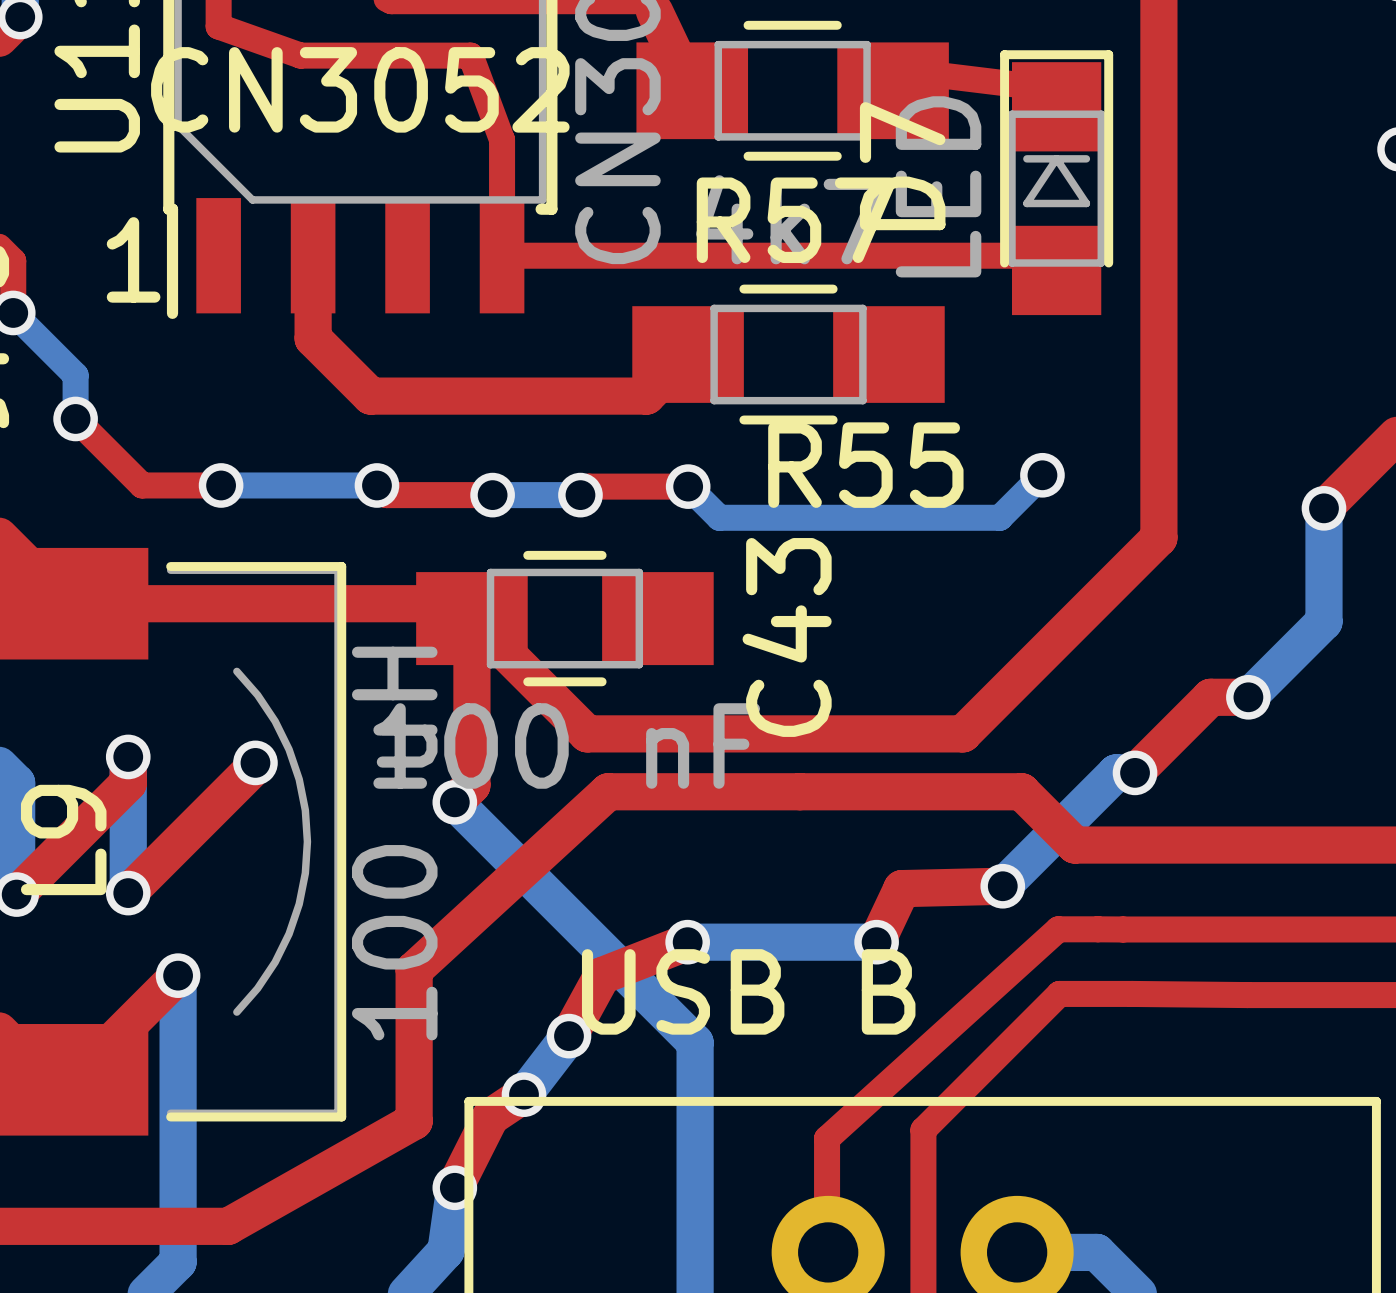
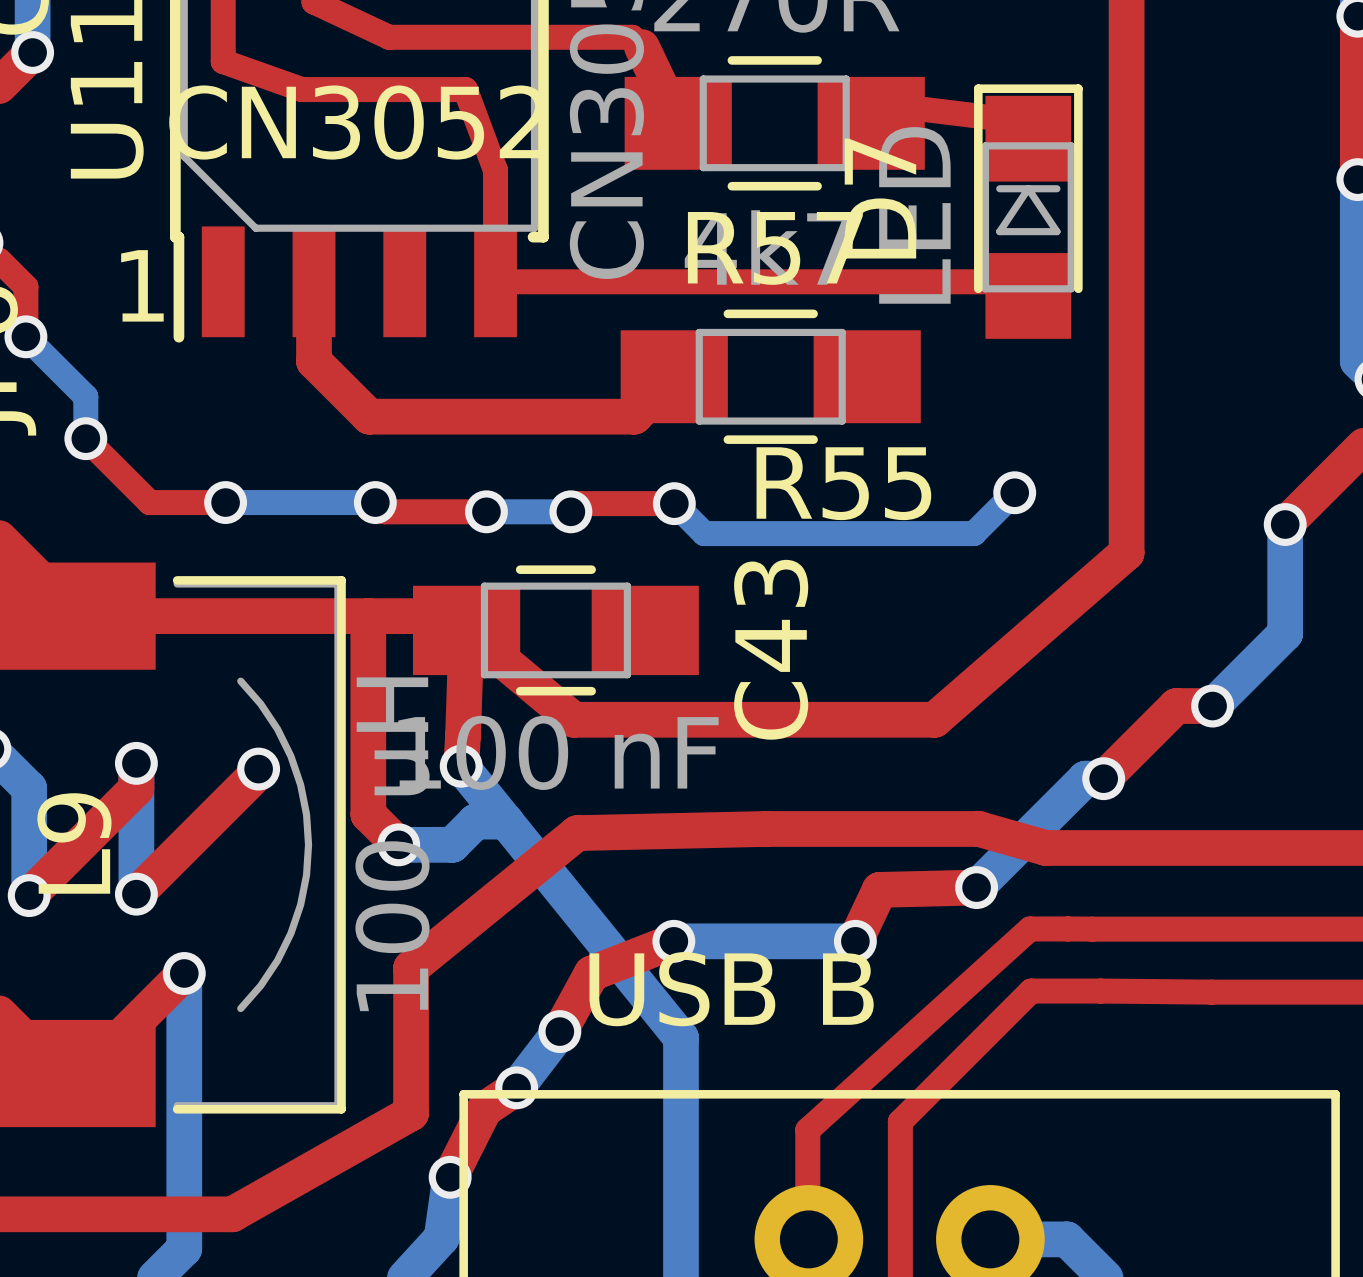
top track: (1158, 537) (962, 733) (587, 733) (471, 618) (471, 785) (454, 802) -> (1126, 552) (934, 719) (573, 719) (466, 630) (461, 766)
top track: none -> (368, 616) (368, 814) (398, 844)
bottom track: (454, 802) (695, 1042) -> (461, 766) (681, 1037)
via position: (454, 802) -> (461, 766)
bottom track: none -> (506, 821) (475, 821) (452, 844) (398, 844)
via: none -> (398, 844)
top track: (1074, 845) (1021, 791) (608, 791) (414, 970) -> (1045, 848) (979, 828) (766, 828) (577, 833) (411, 968)

